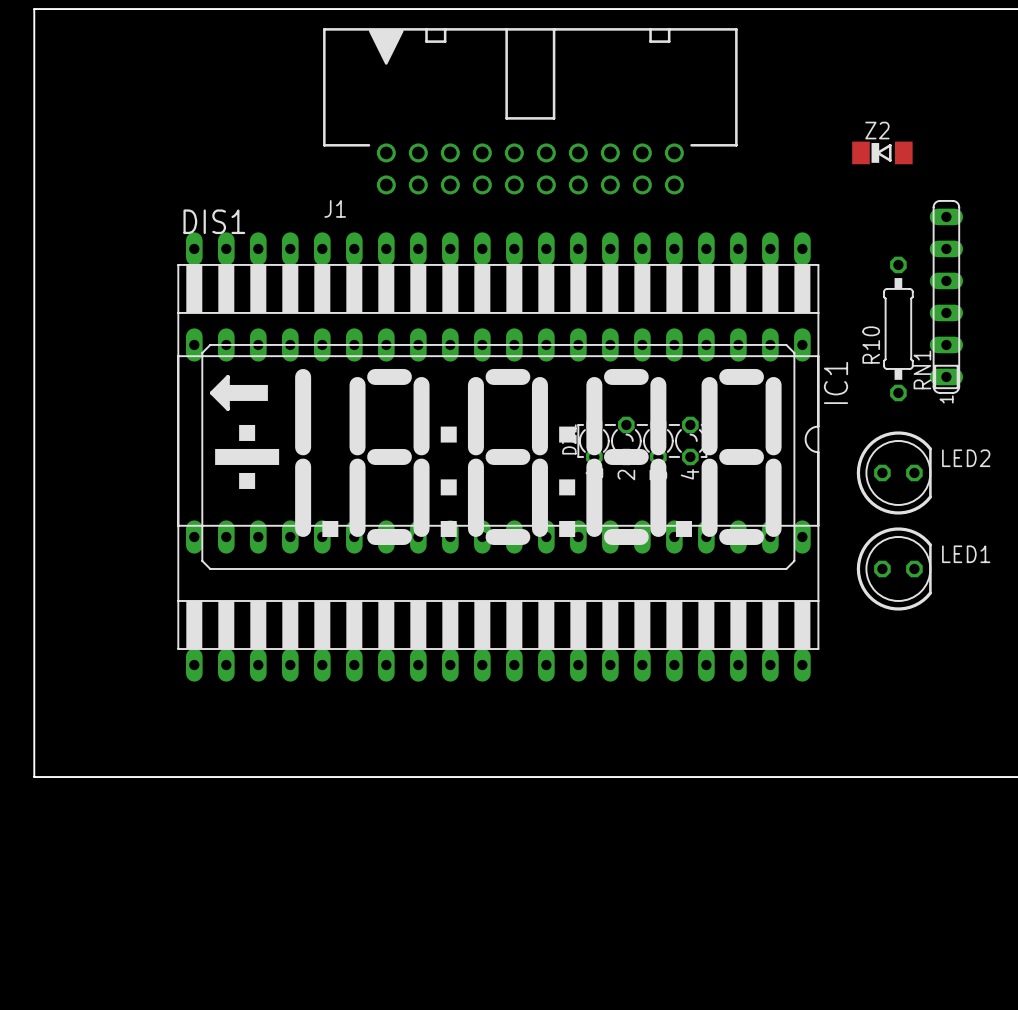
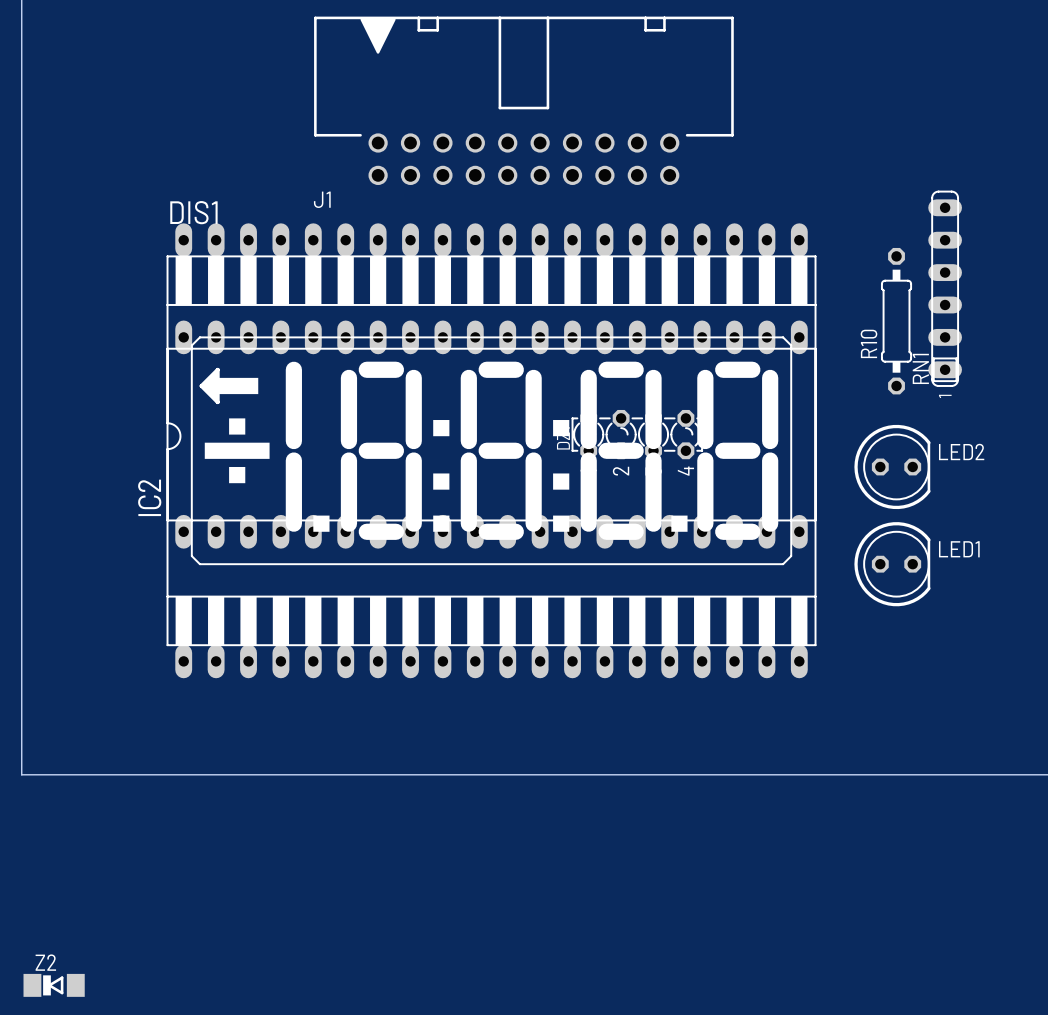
Z2 position: (882, 152) -> (54, 985)
IC1: (498, 440) -> none
IC2: none -> (491, 434)

